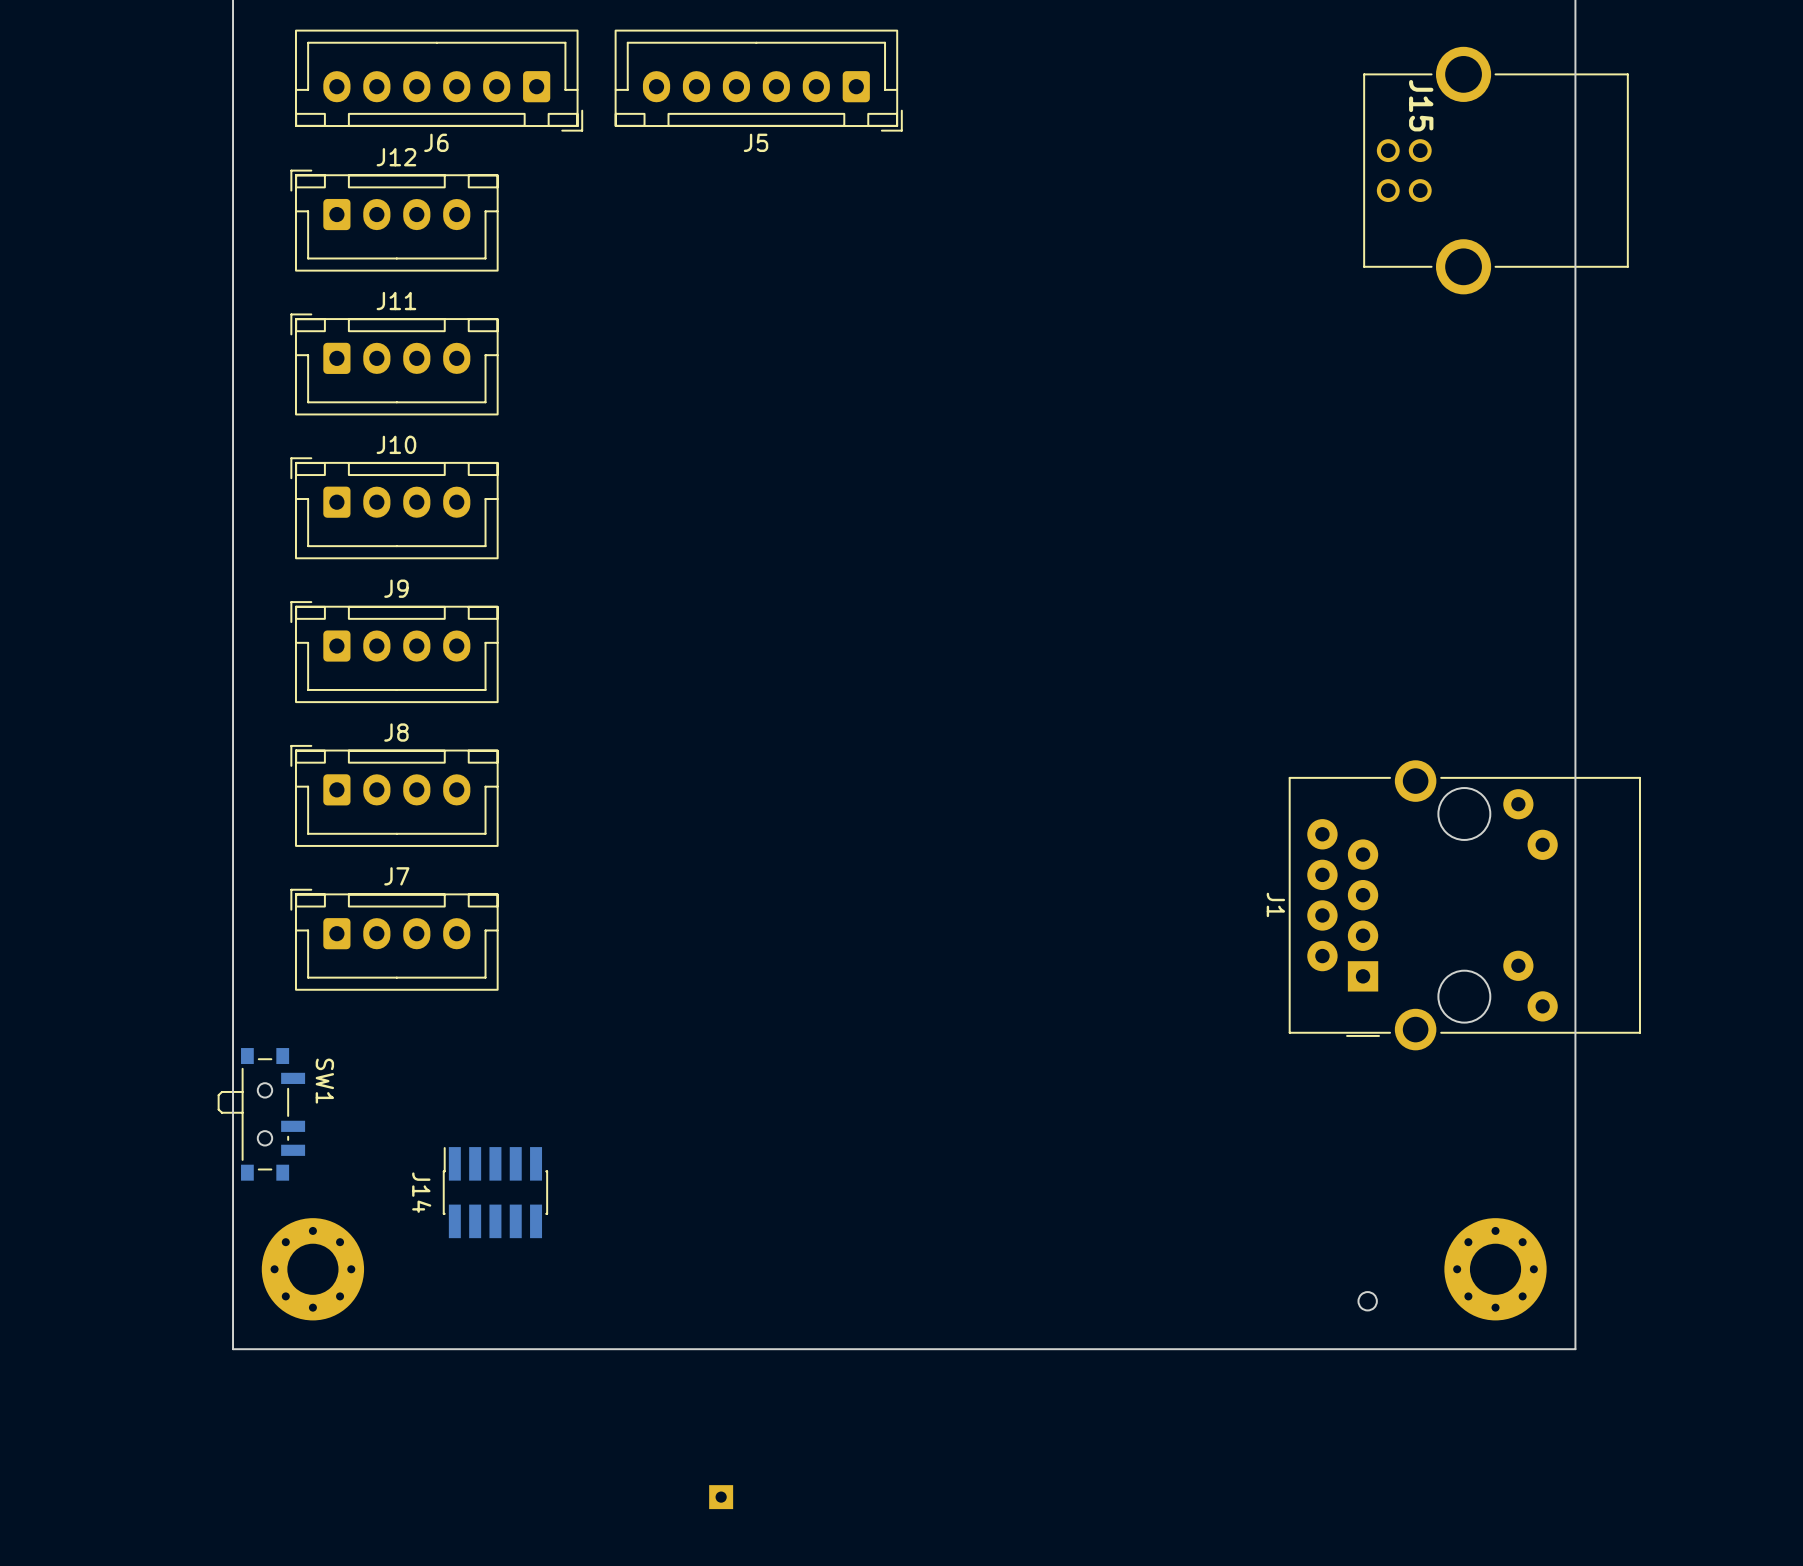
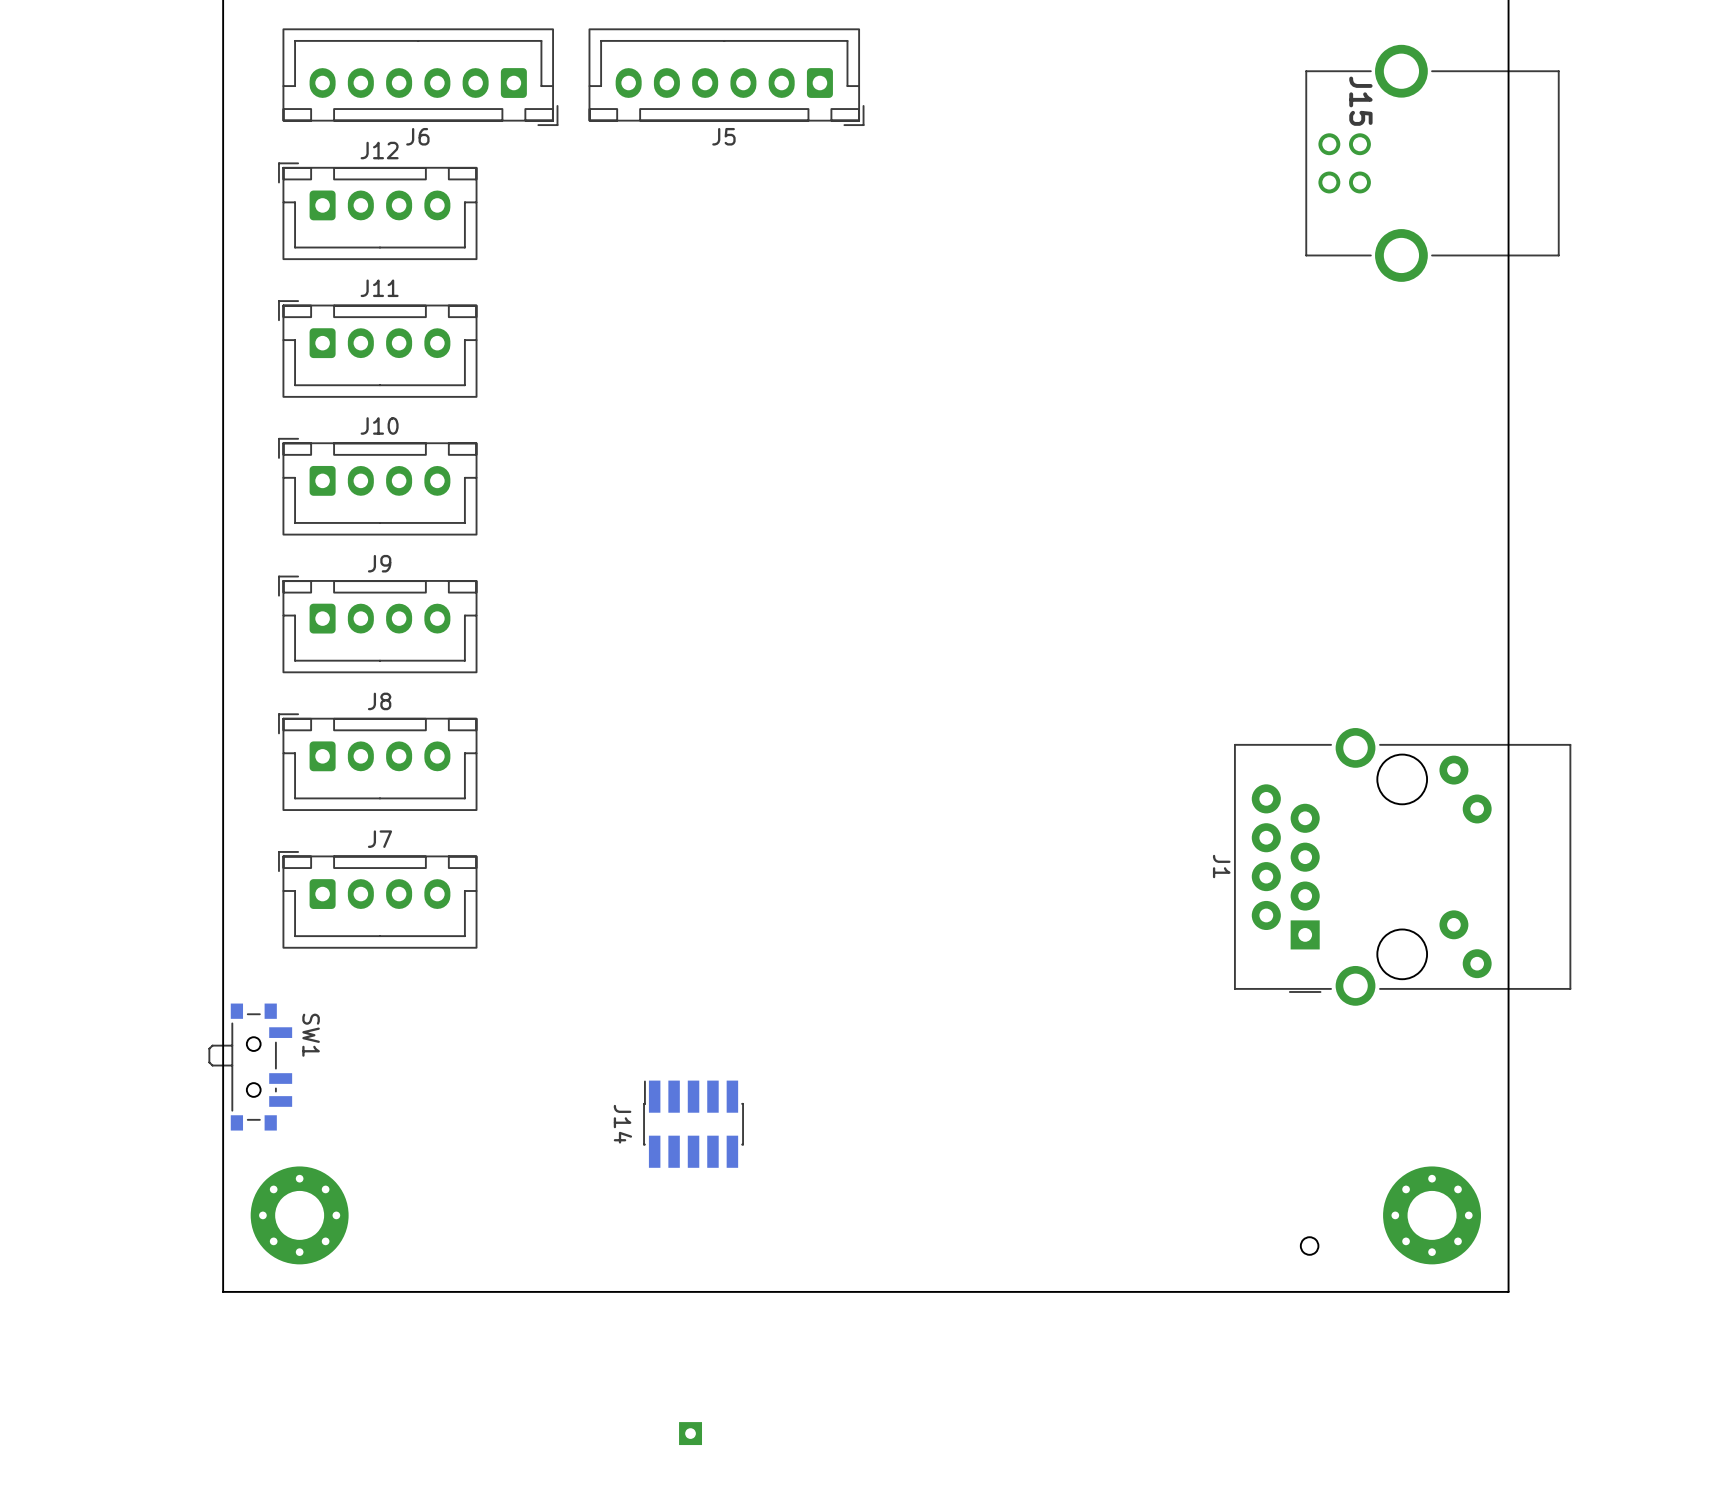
J14 position: (495, 1192) -> (693, 1124)

